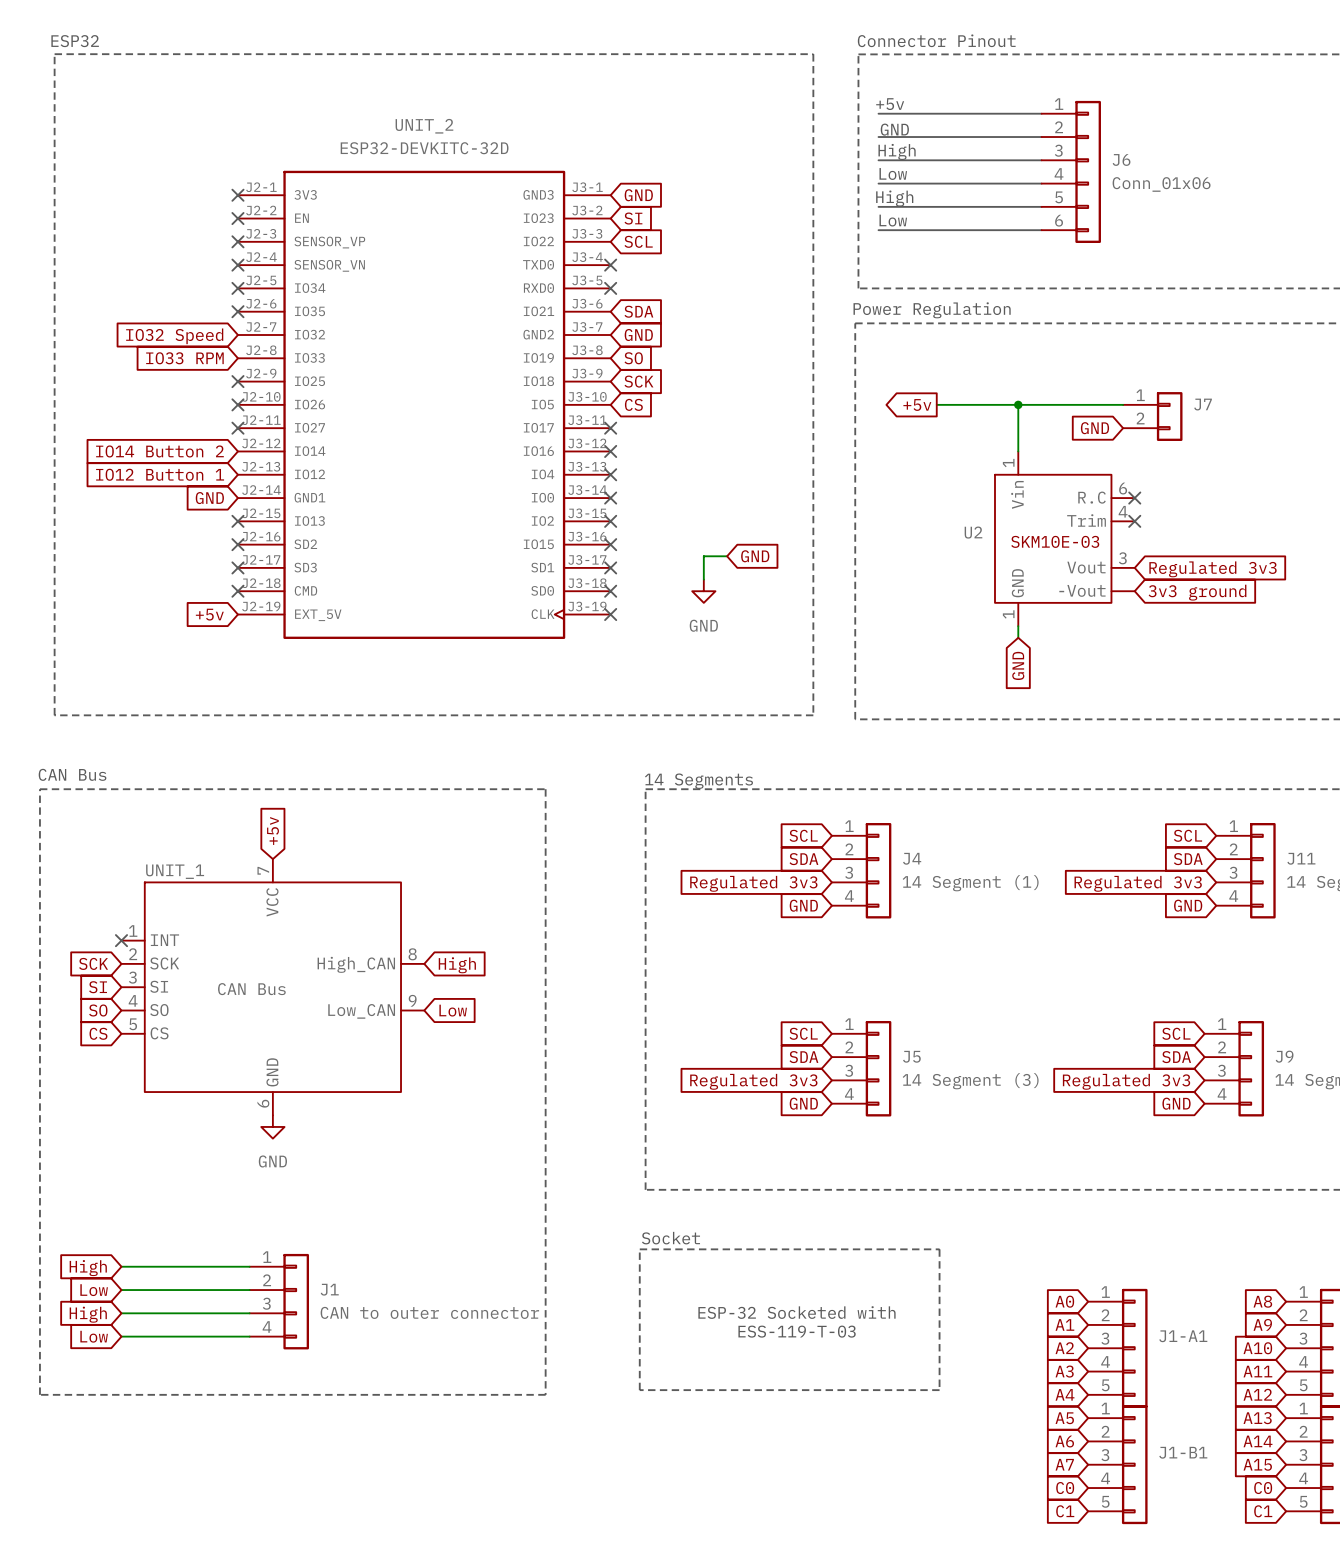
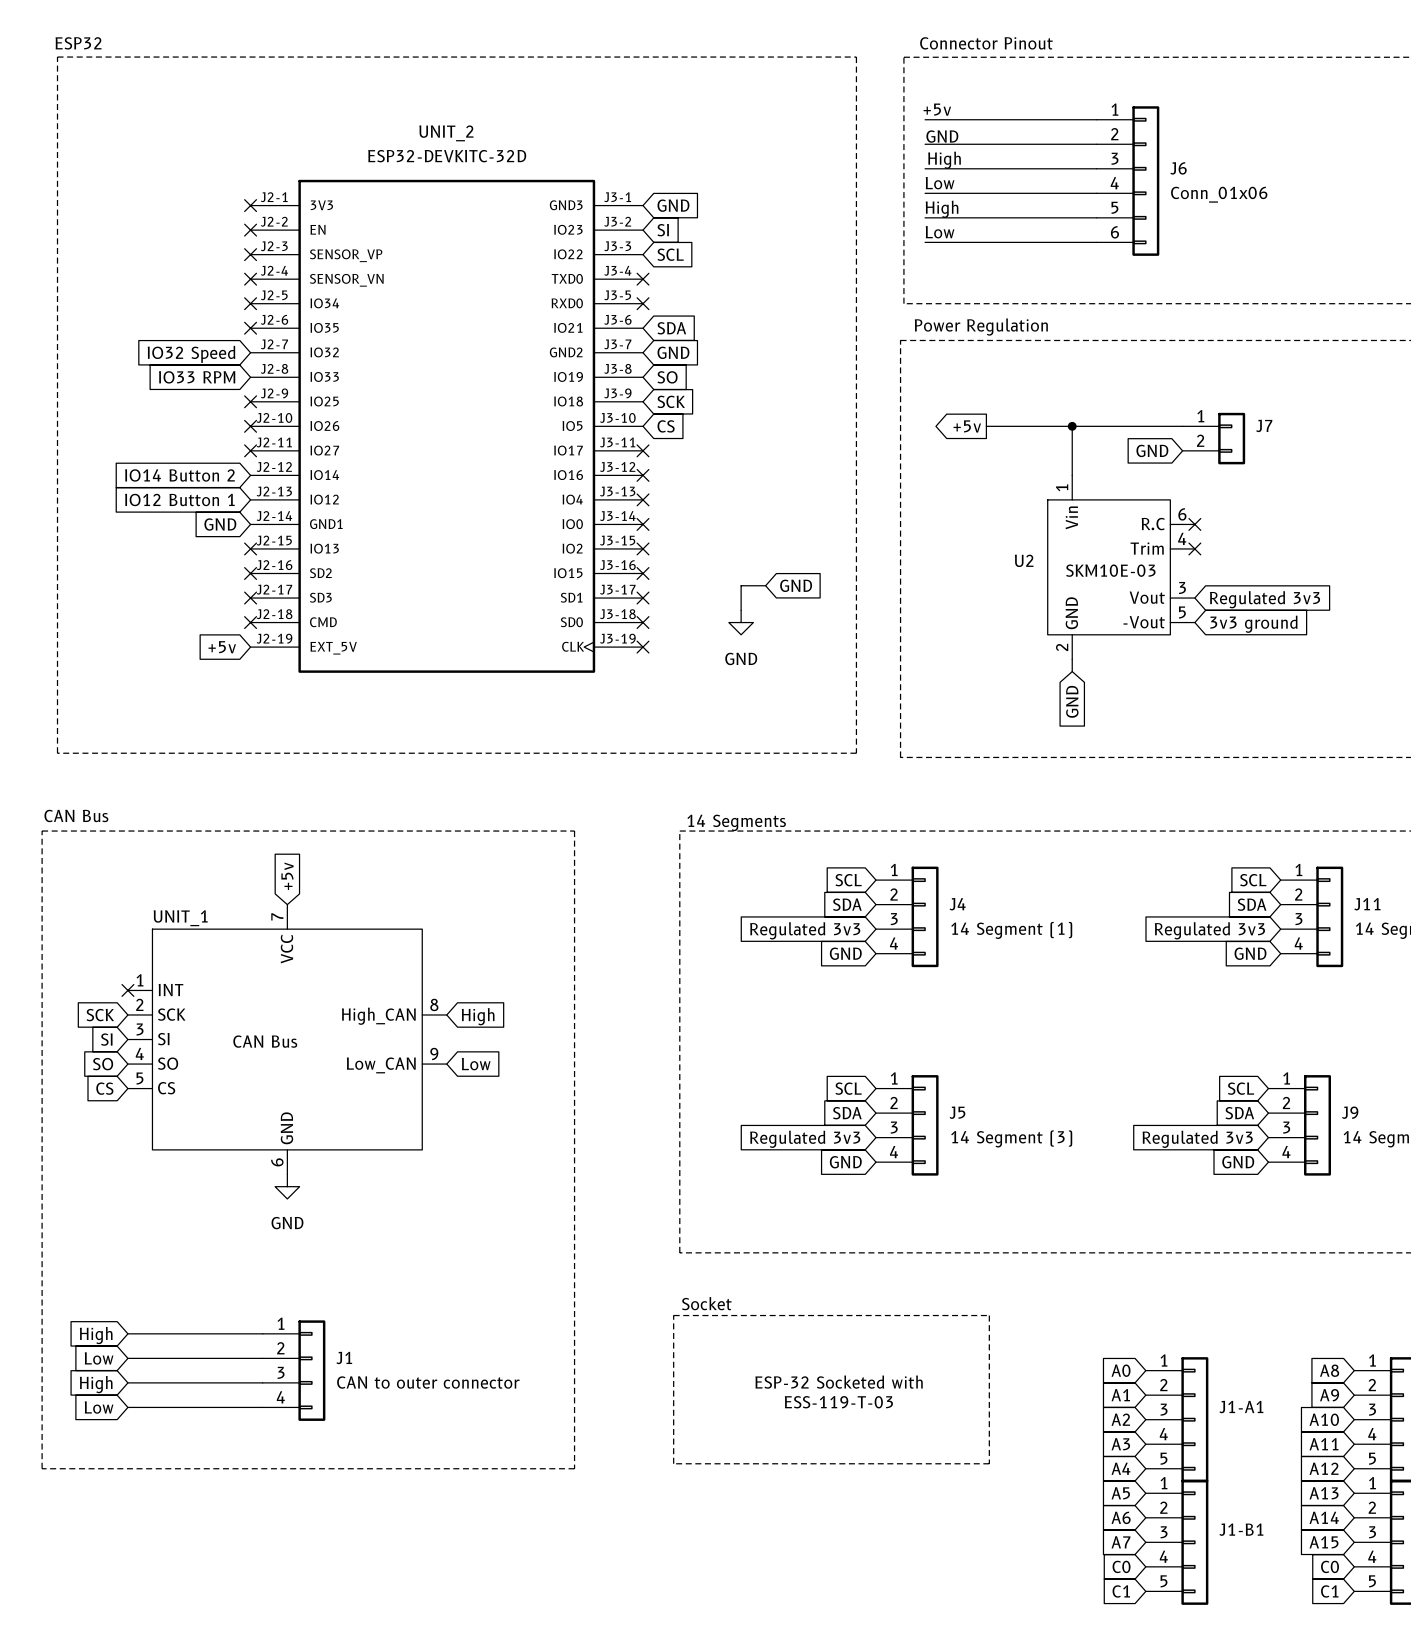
U2 pin number: none -> 5 (1182, 612)
U2 pin number: 1 (1008, 614) -> 2 (1062, 647)

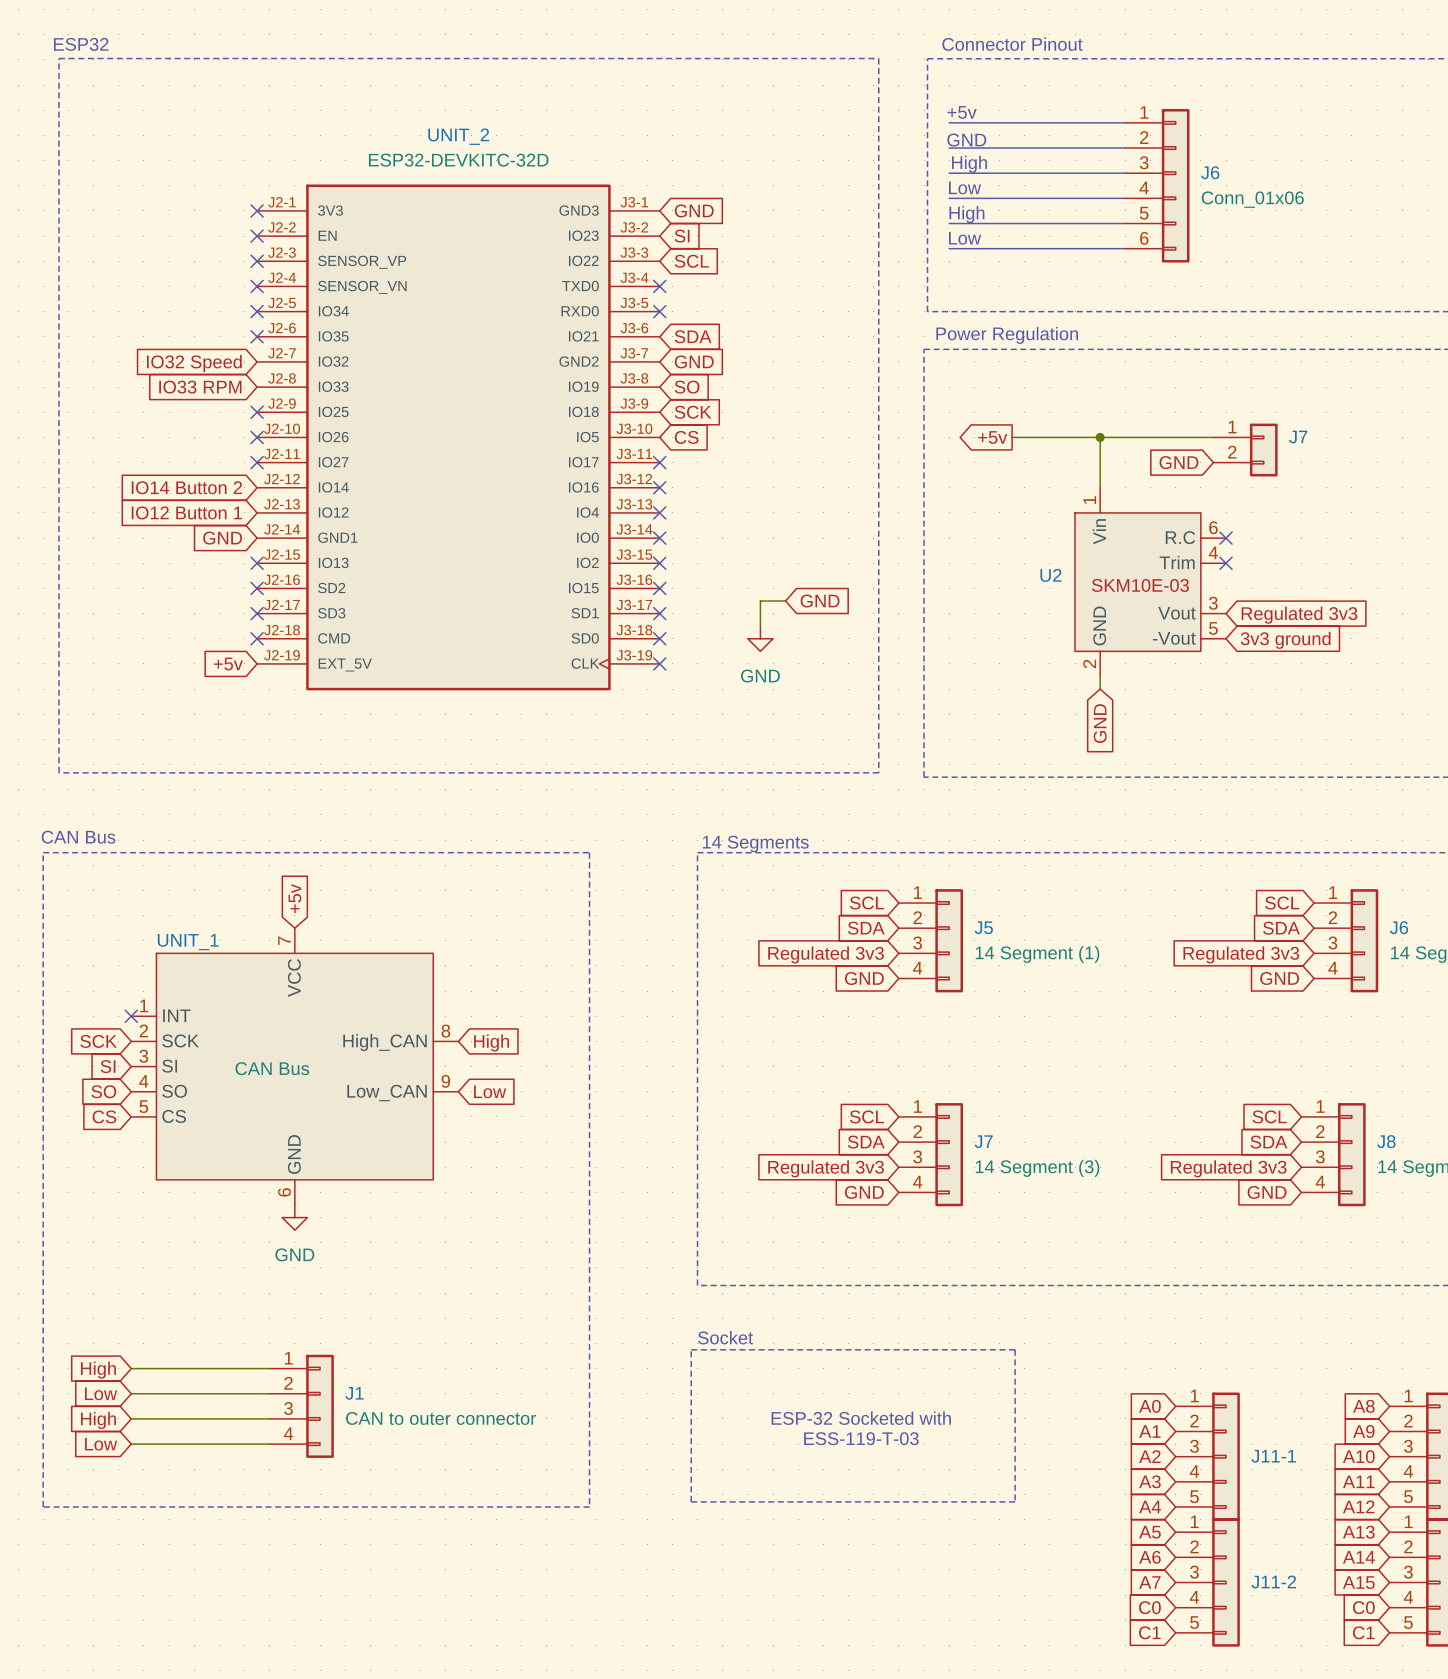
J4 name: J4 (957, 904) -> J5 (983, 927)
J11 name: J11 (1367, 904) -> J6 (1398, 927)
J5 name: J5 (957, 1112) -> J7 (983, 1141)
J9 name: J9 (1350, 1112) -> J8 (1386, 1141)
J1-A1 name: J1-A1 (1241, 1407) -> J11-1 (1273, 1456)
J1-B1 name: J1-B1 (1241, 1529) -> J11-2 (1273, 1582)

